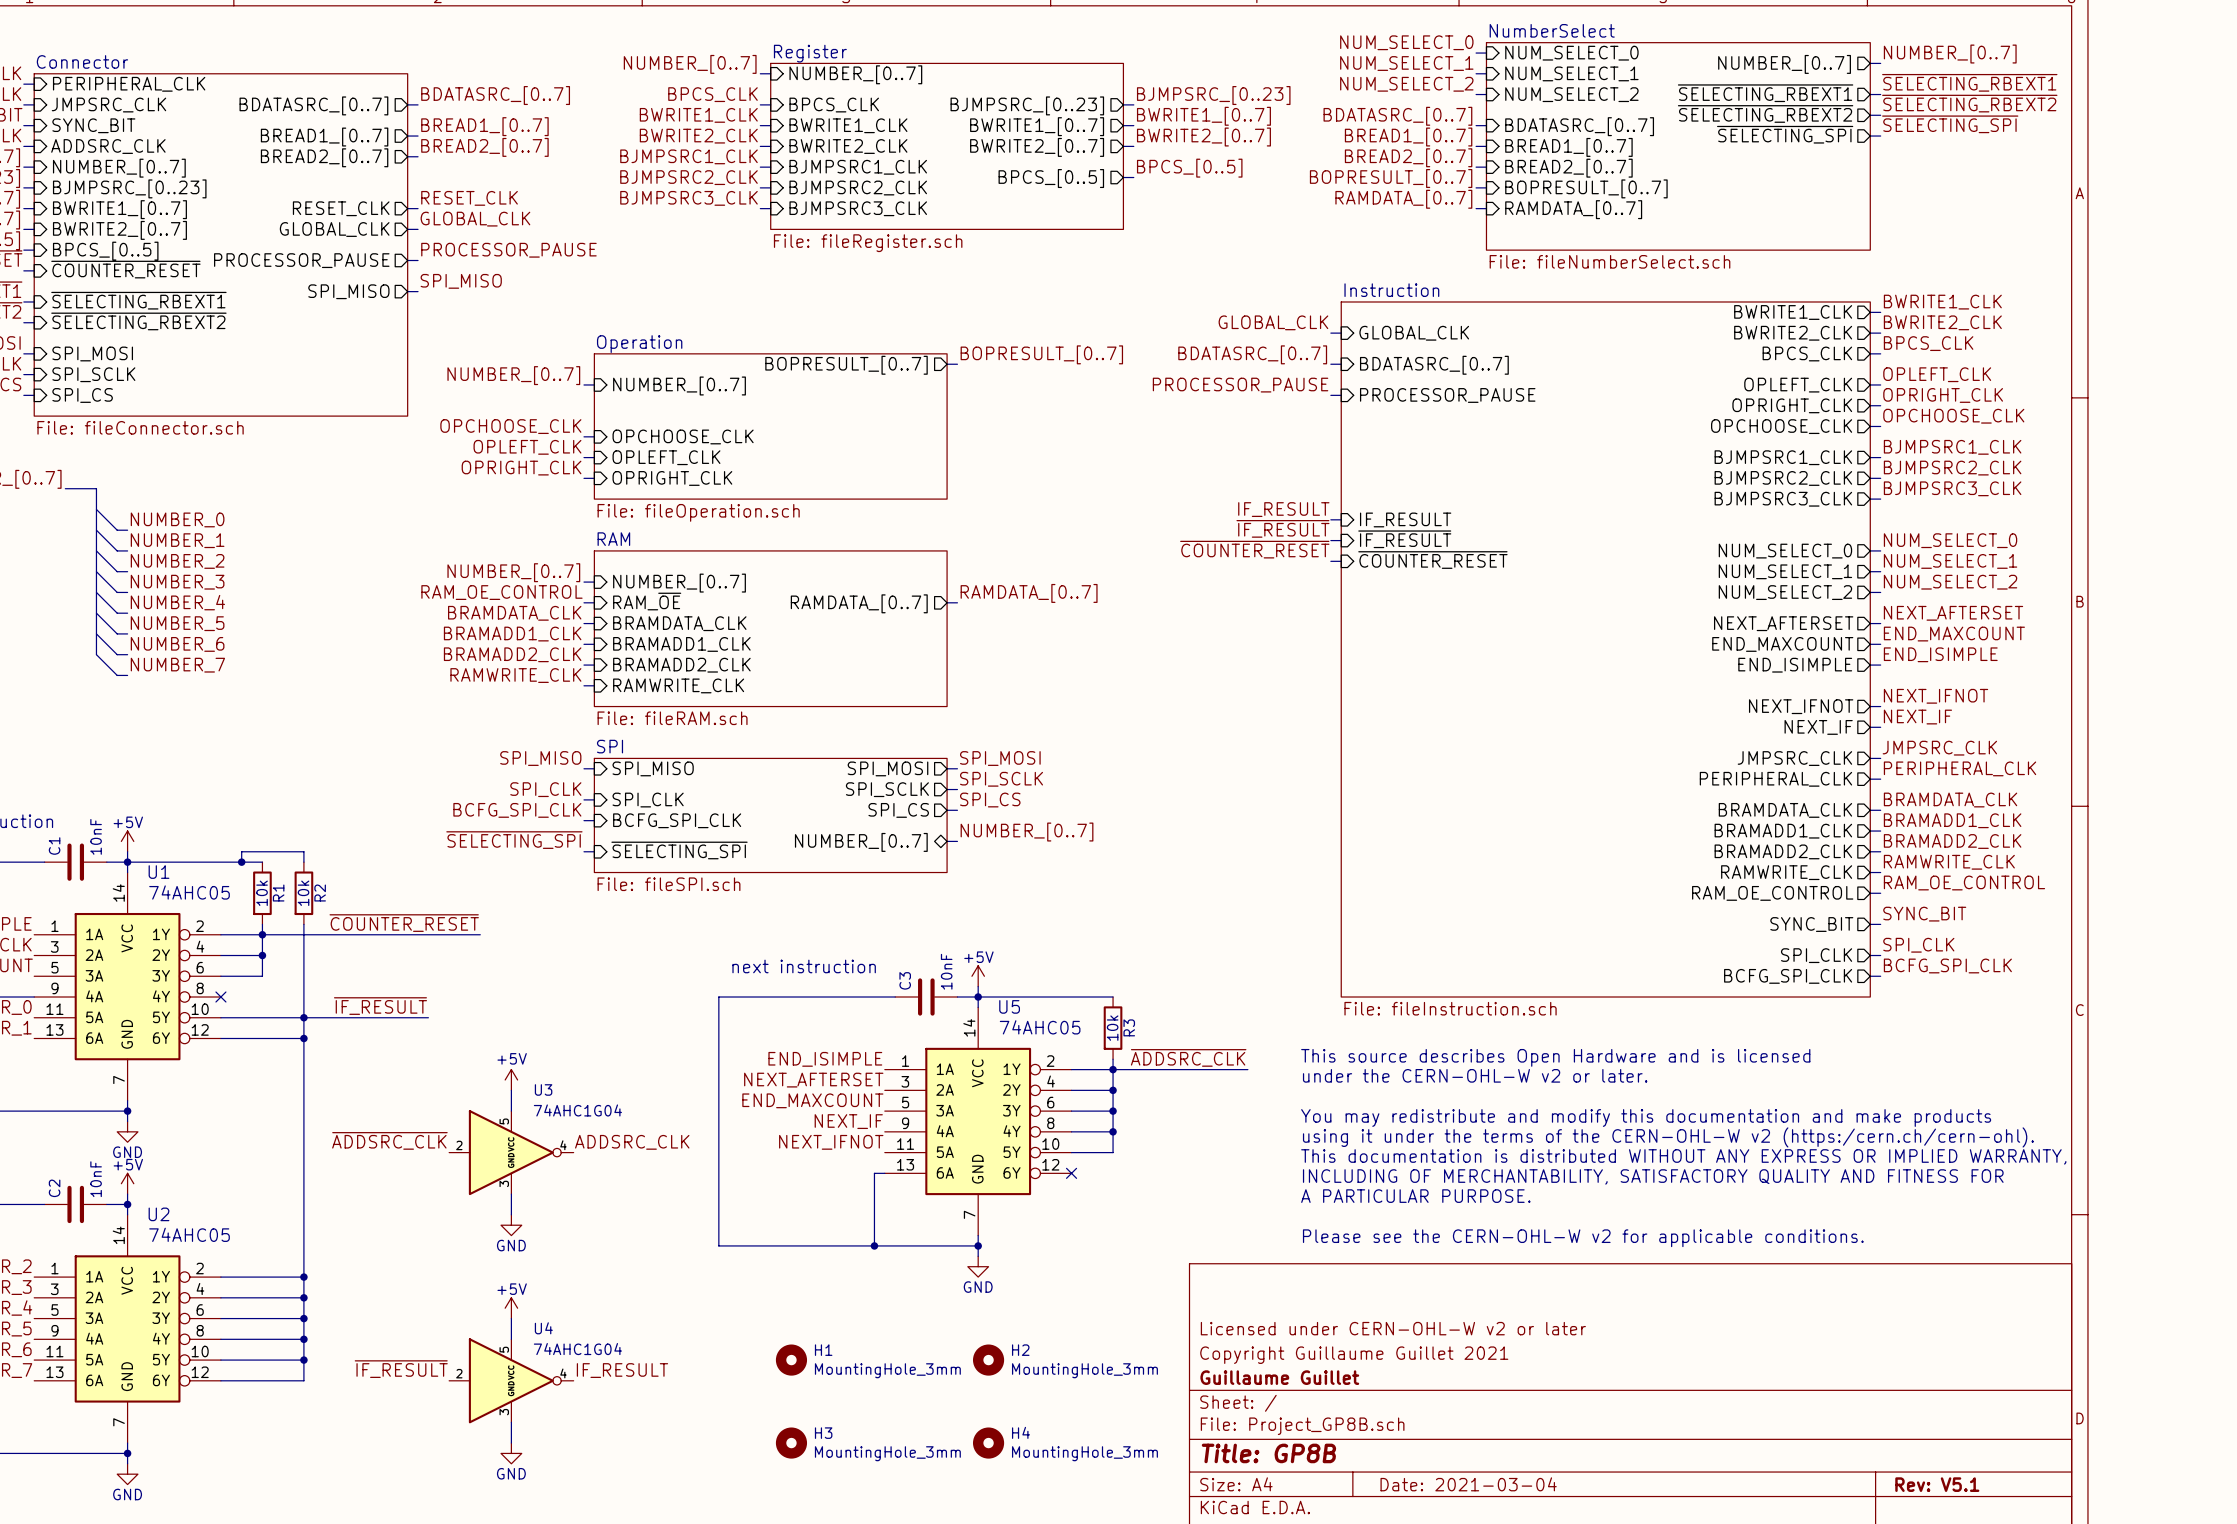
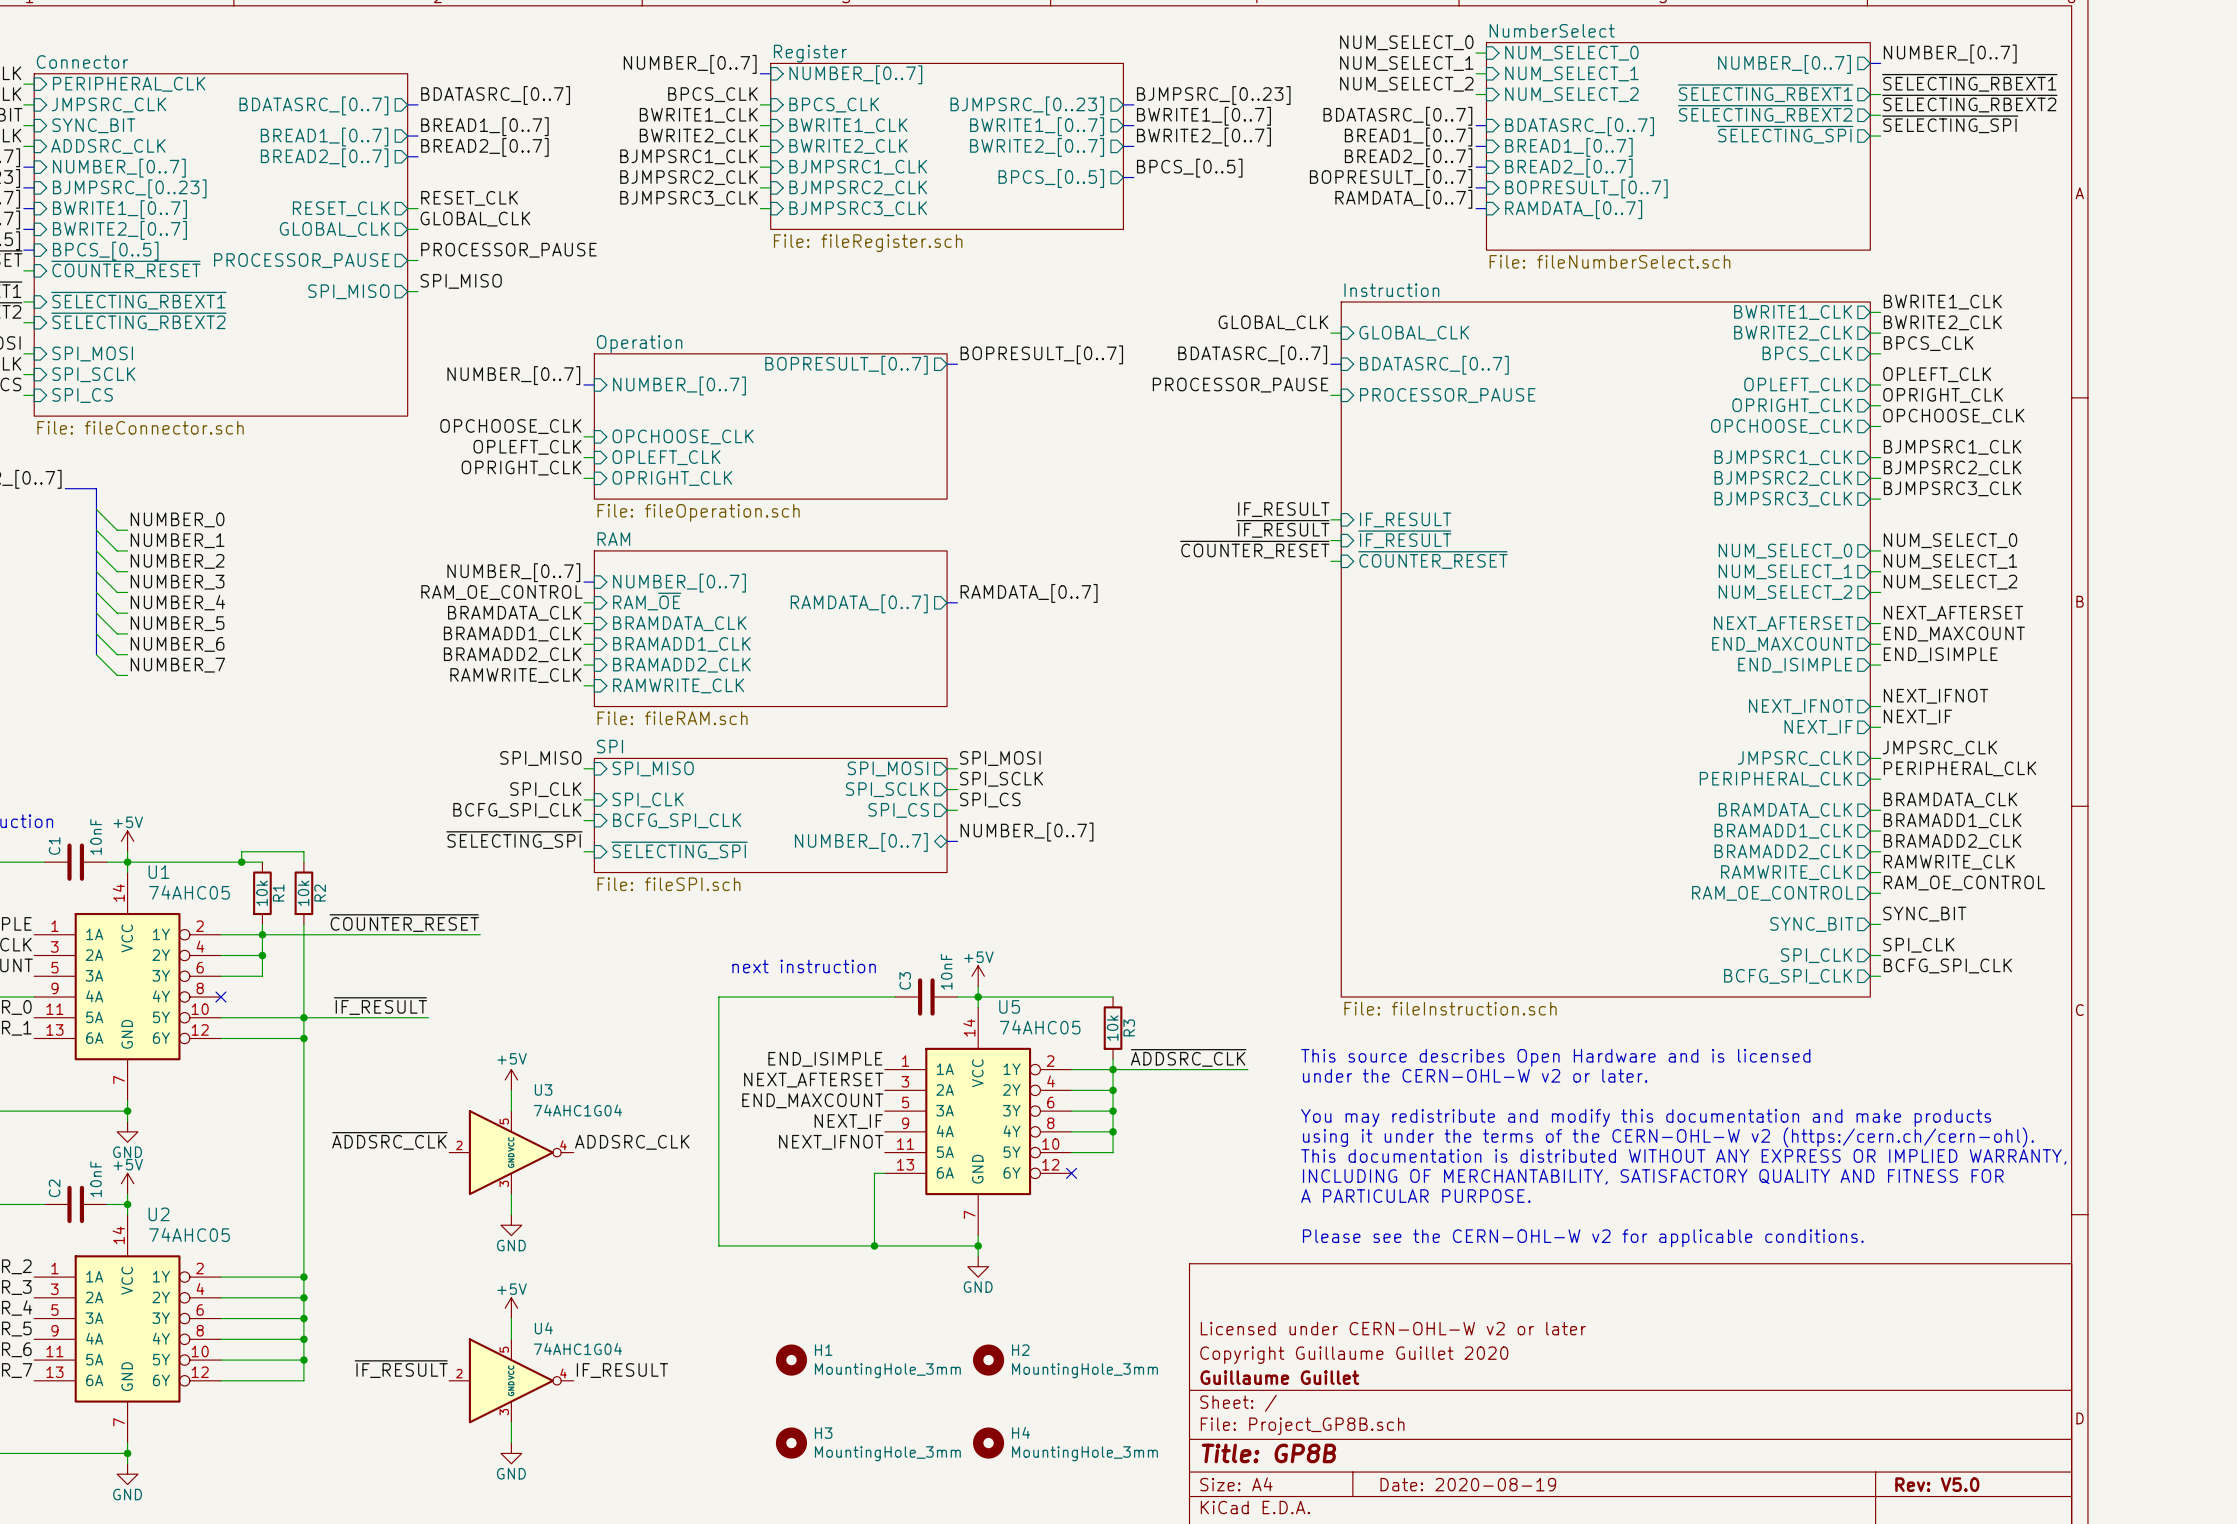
title block: Copyright Guillaume Guillet 2021 (1354, 1355) -> Copyright Guillaume Guillet 2020 (1354, 1355)
title block: Date: 2021-03-04 (1468, 1484) -> Date: 2020-08-19 (1468, 1484)
title block: Rev: V5.1 (1937, 1484) -> Rev: V5.0 (1937, 1484)

